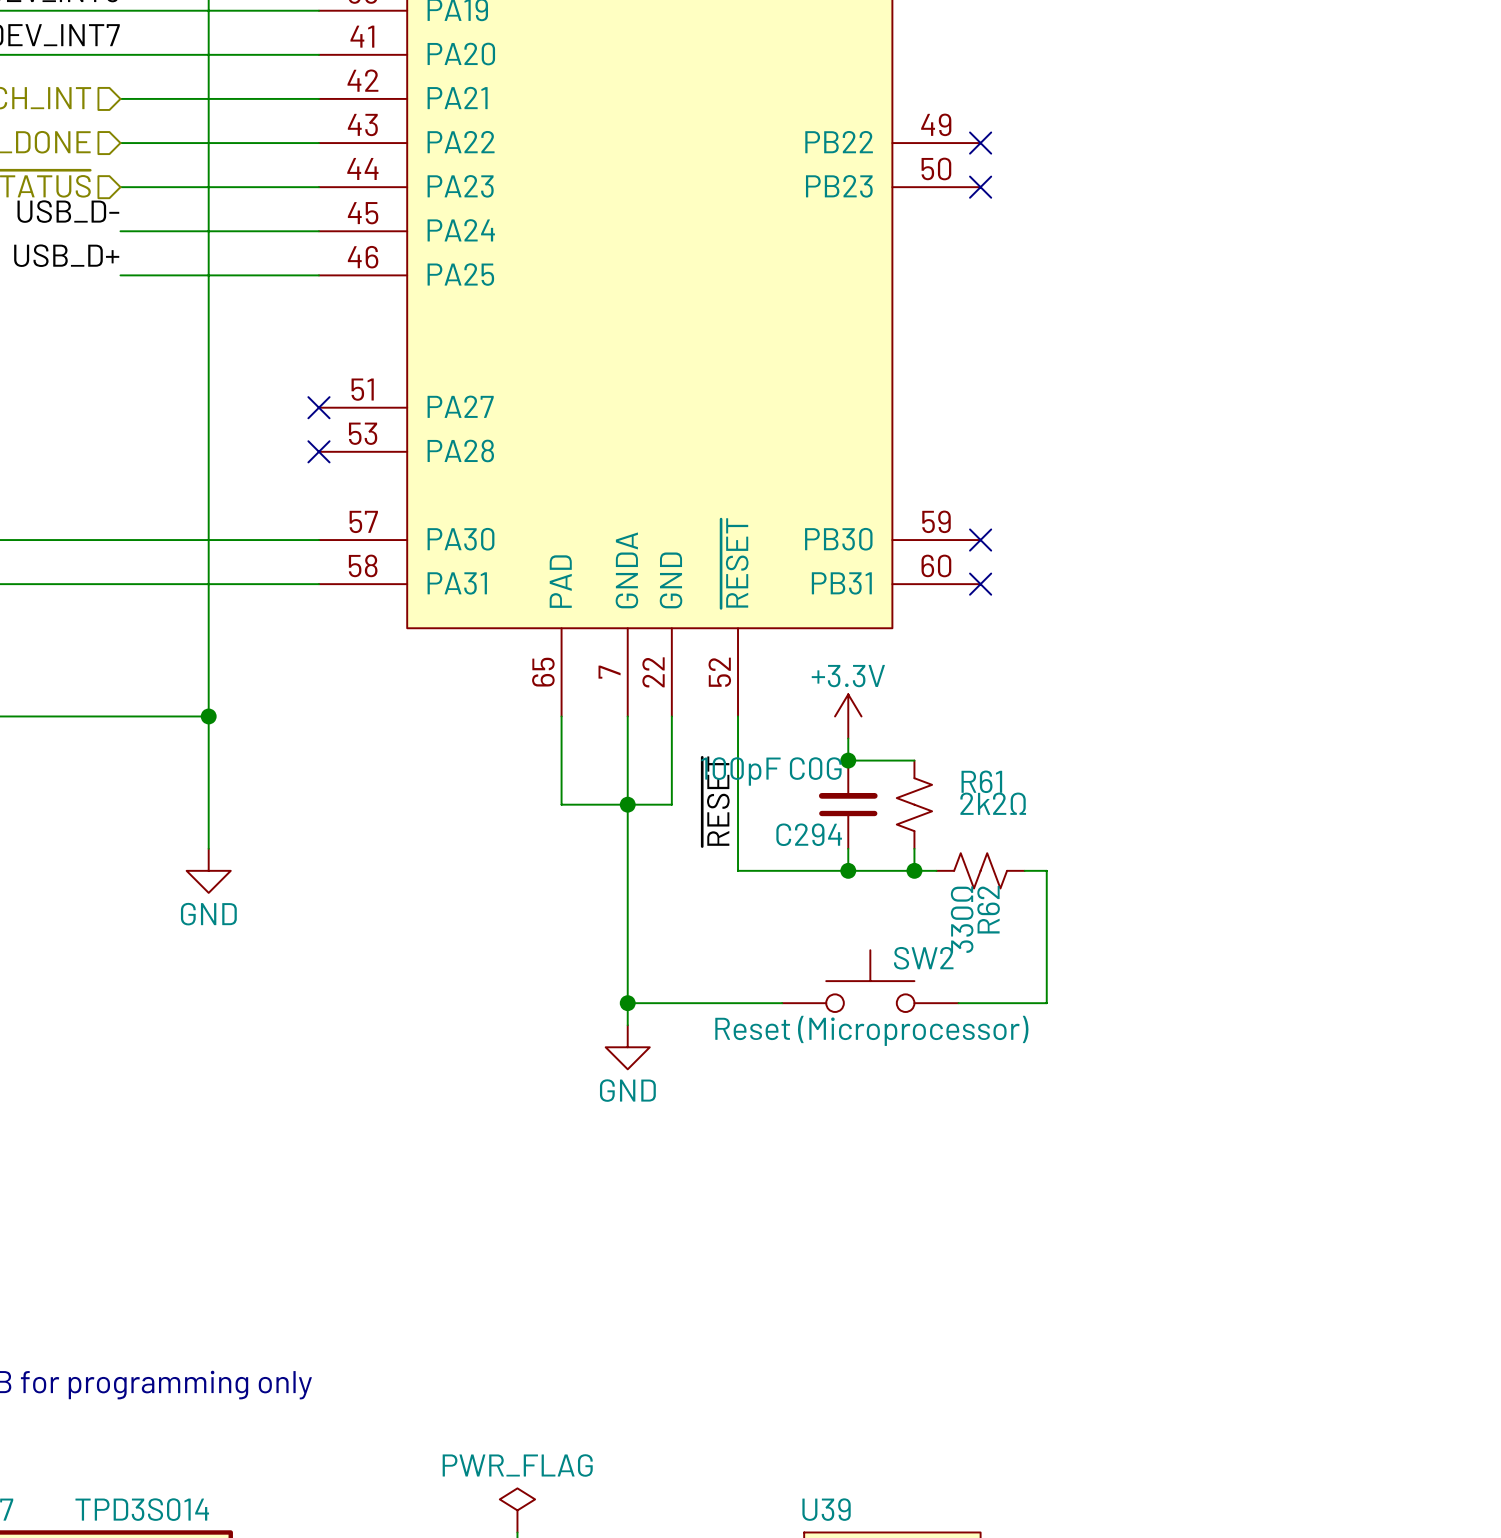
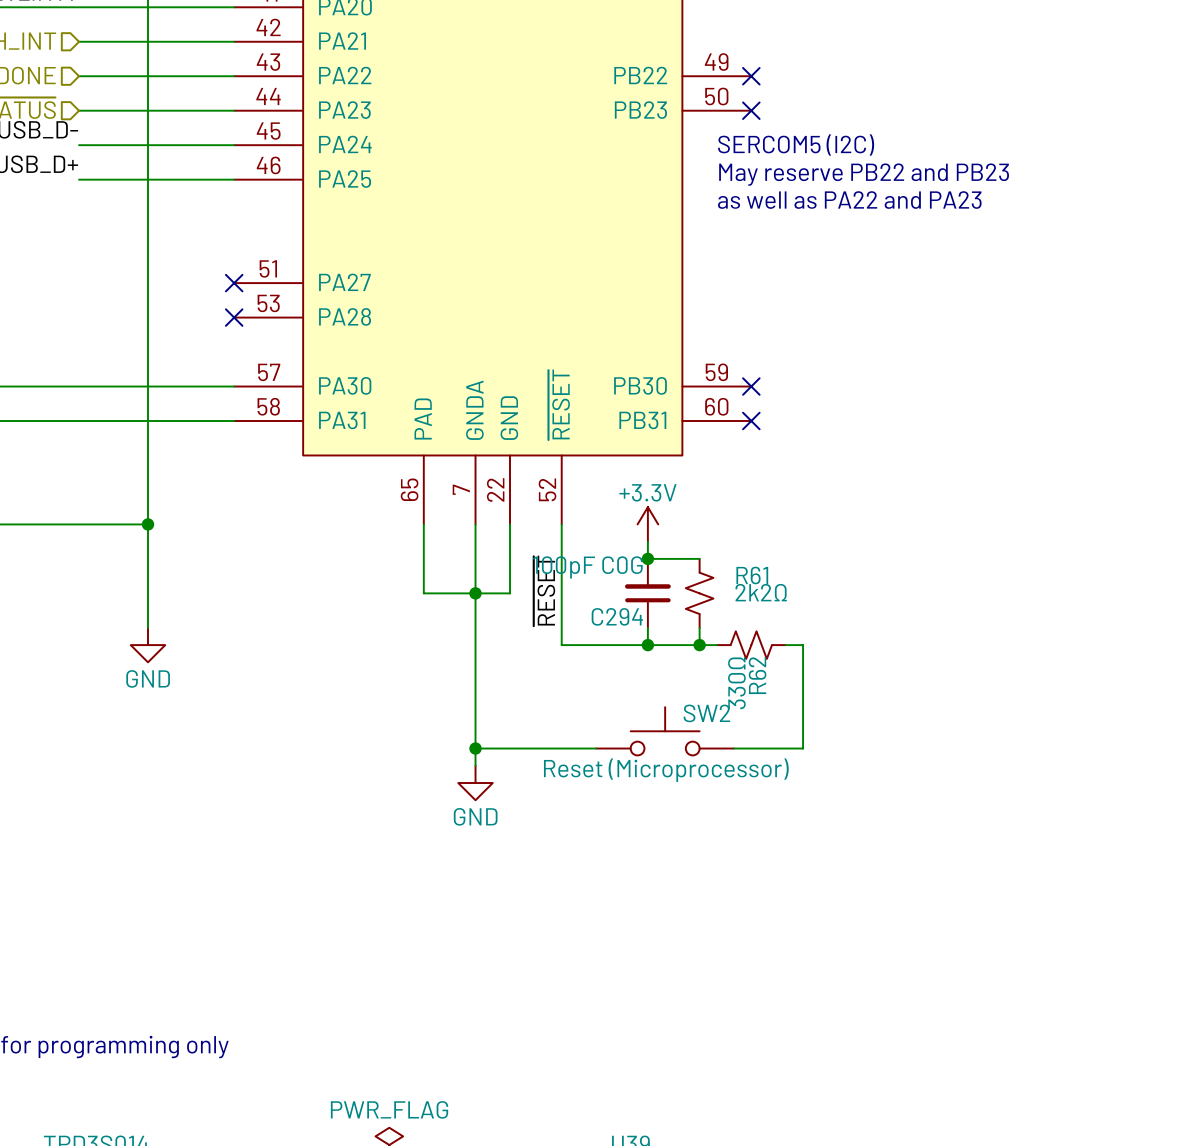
text: none -> SERCOM5 (I2C) (796, 145)
text: none -> May reserve PB22 and PB23 (864, 174)
text: none -> as well as PA22 and PA23 (849, 200)

